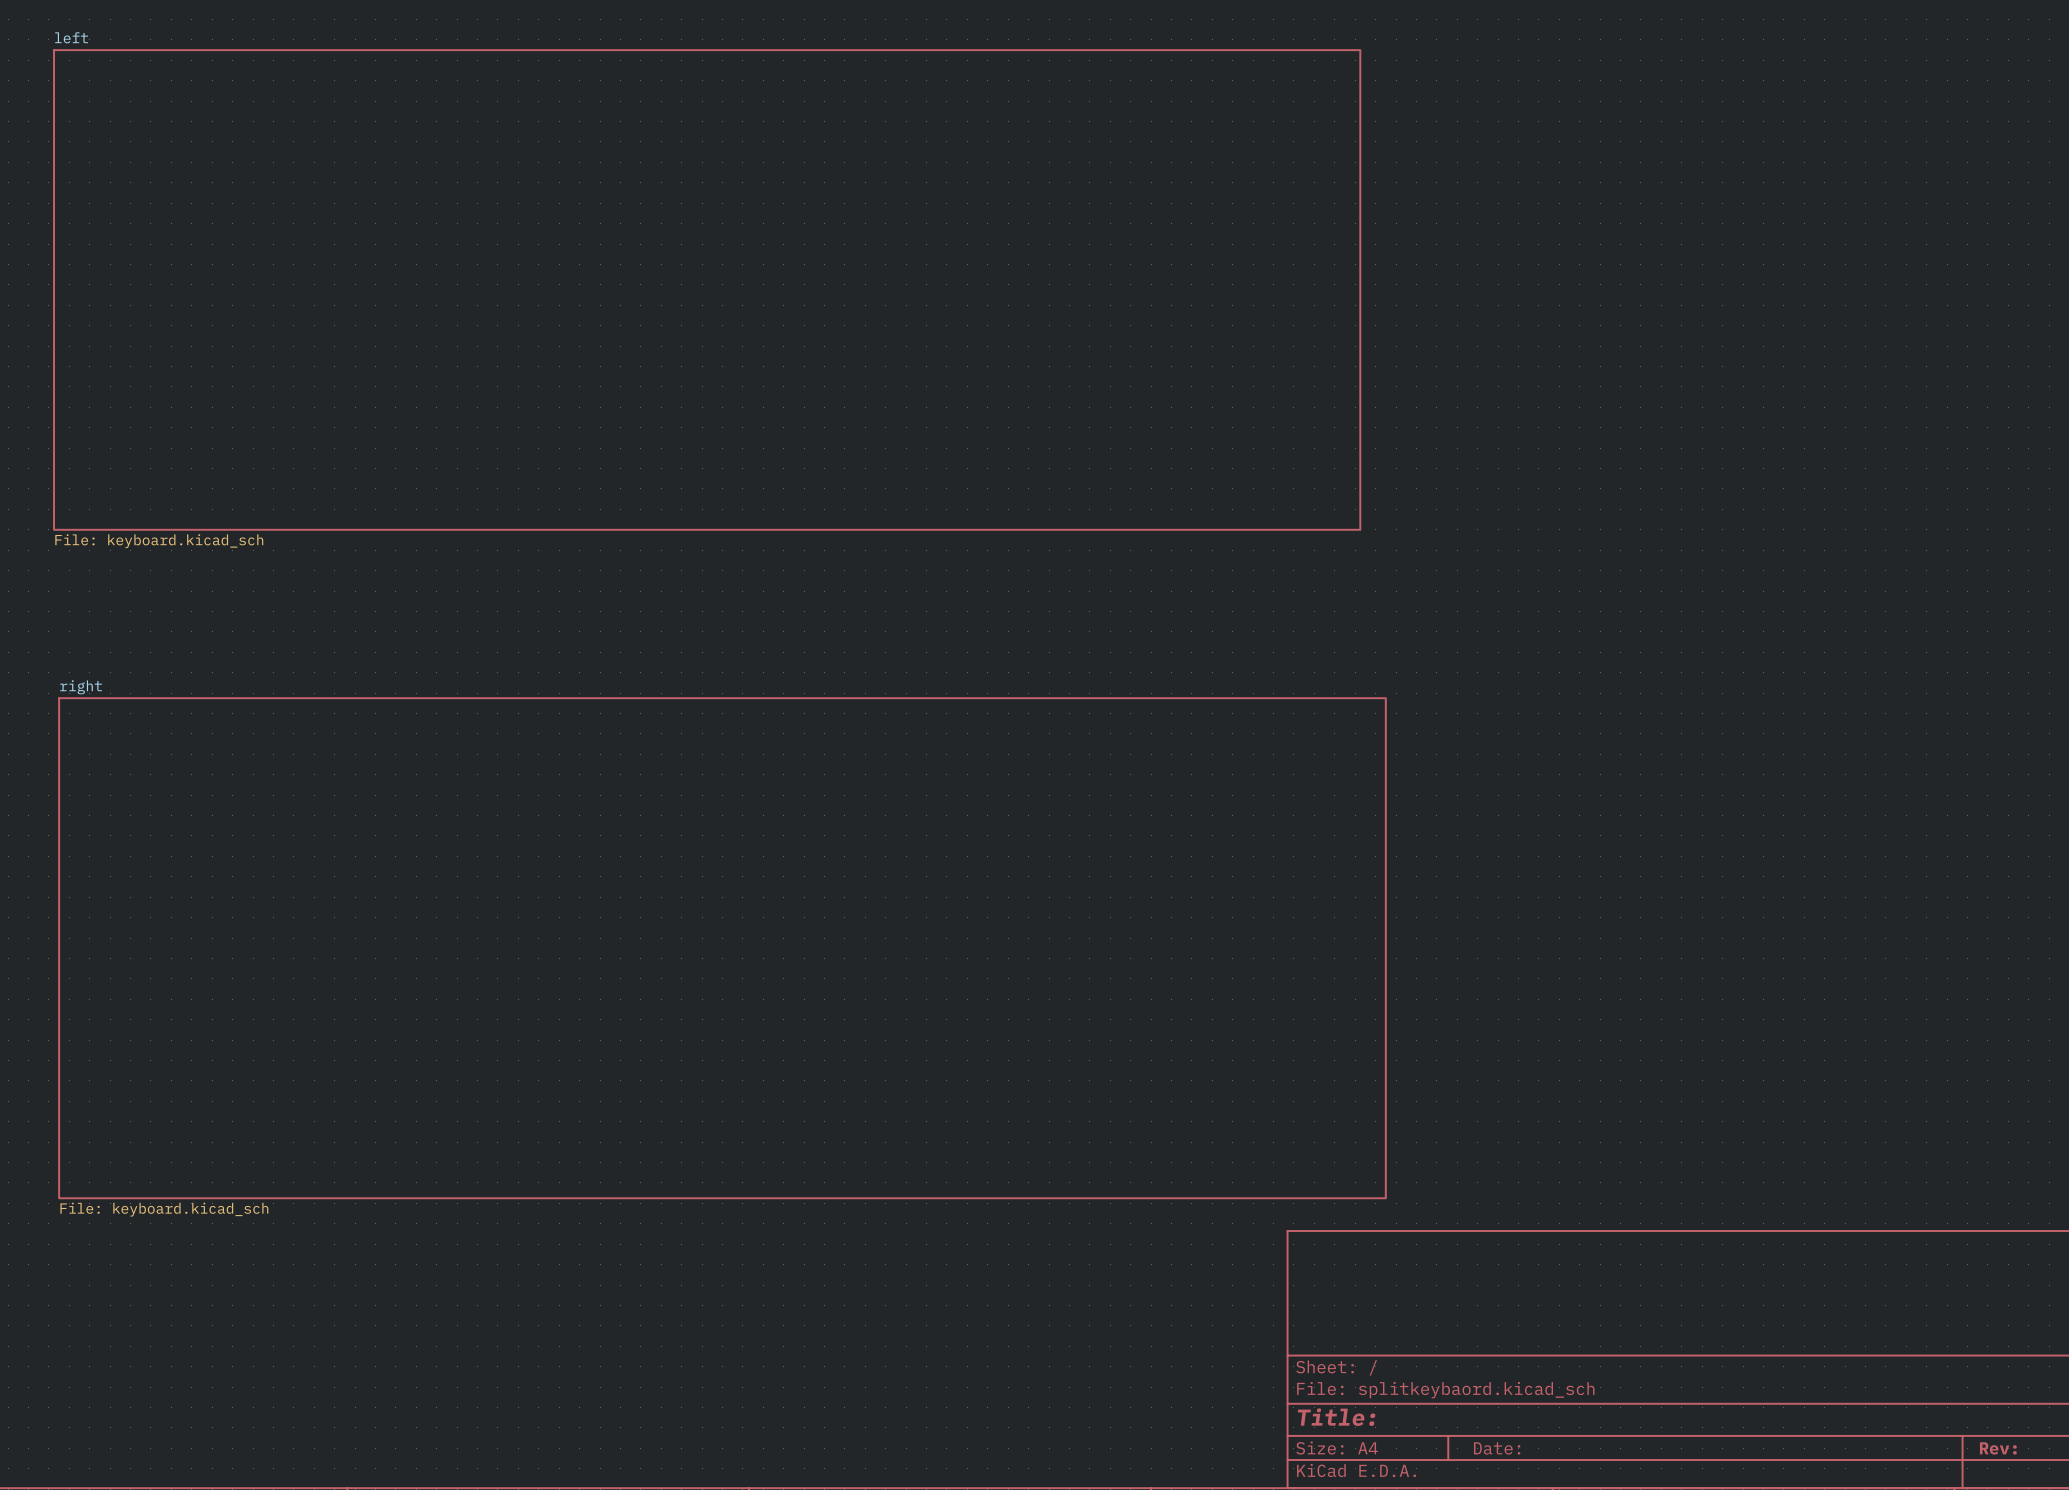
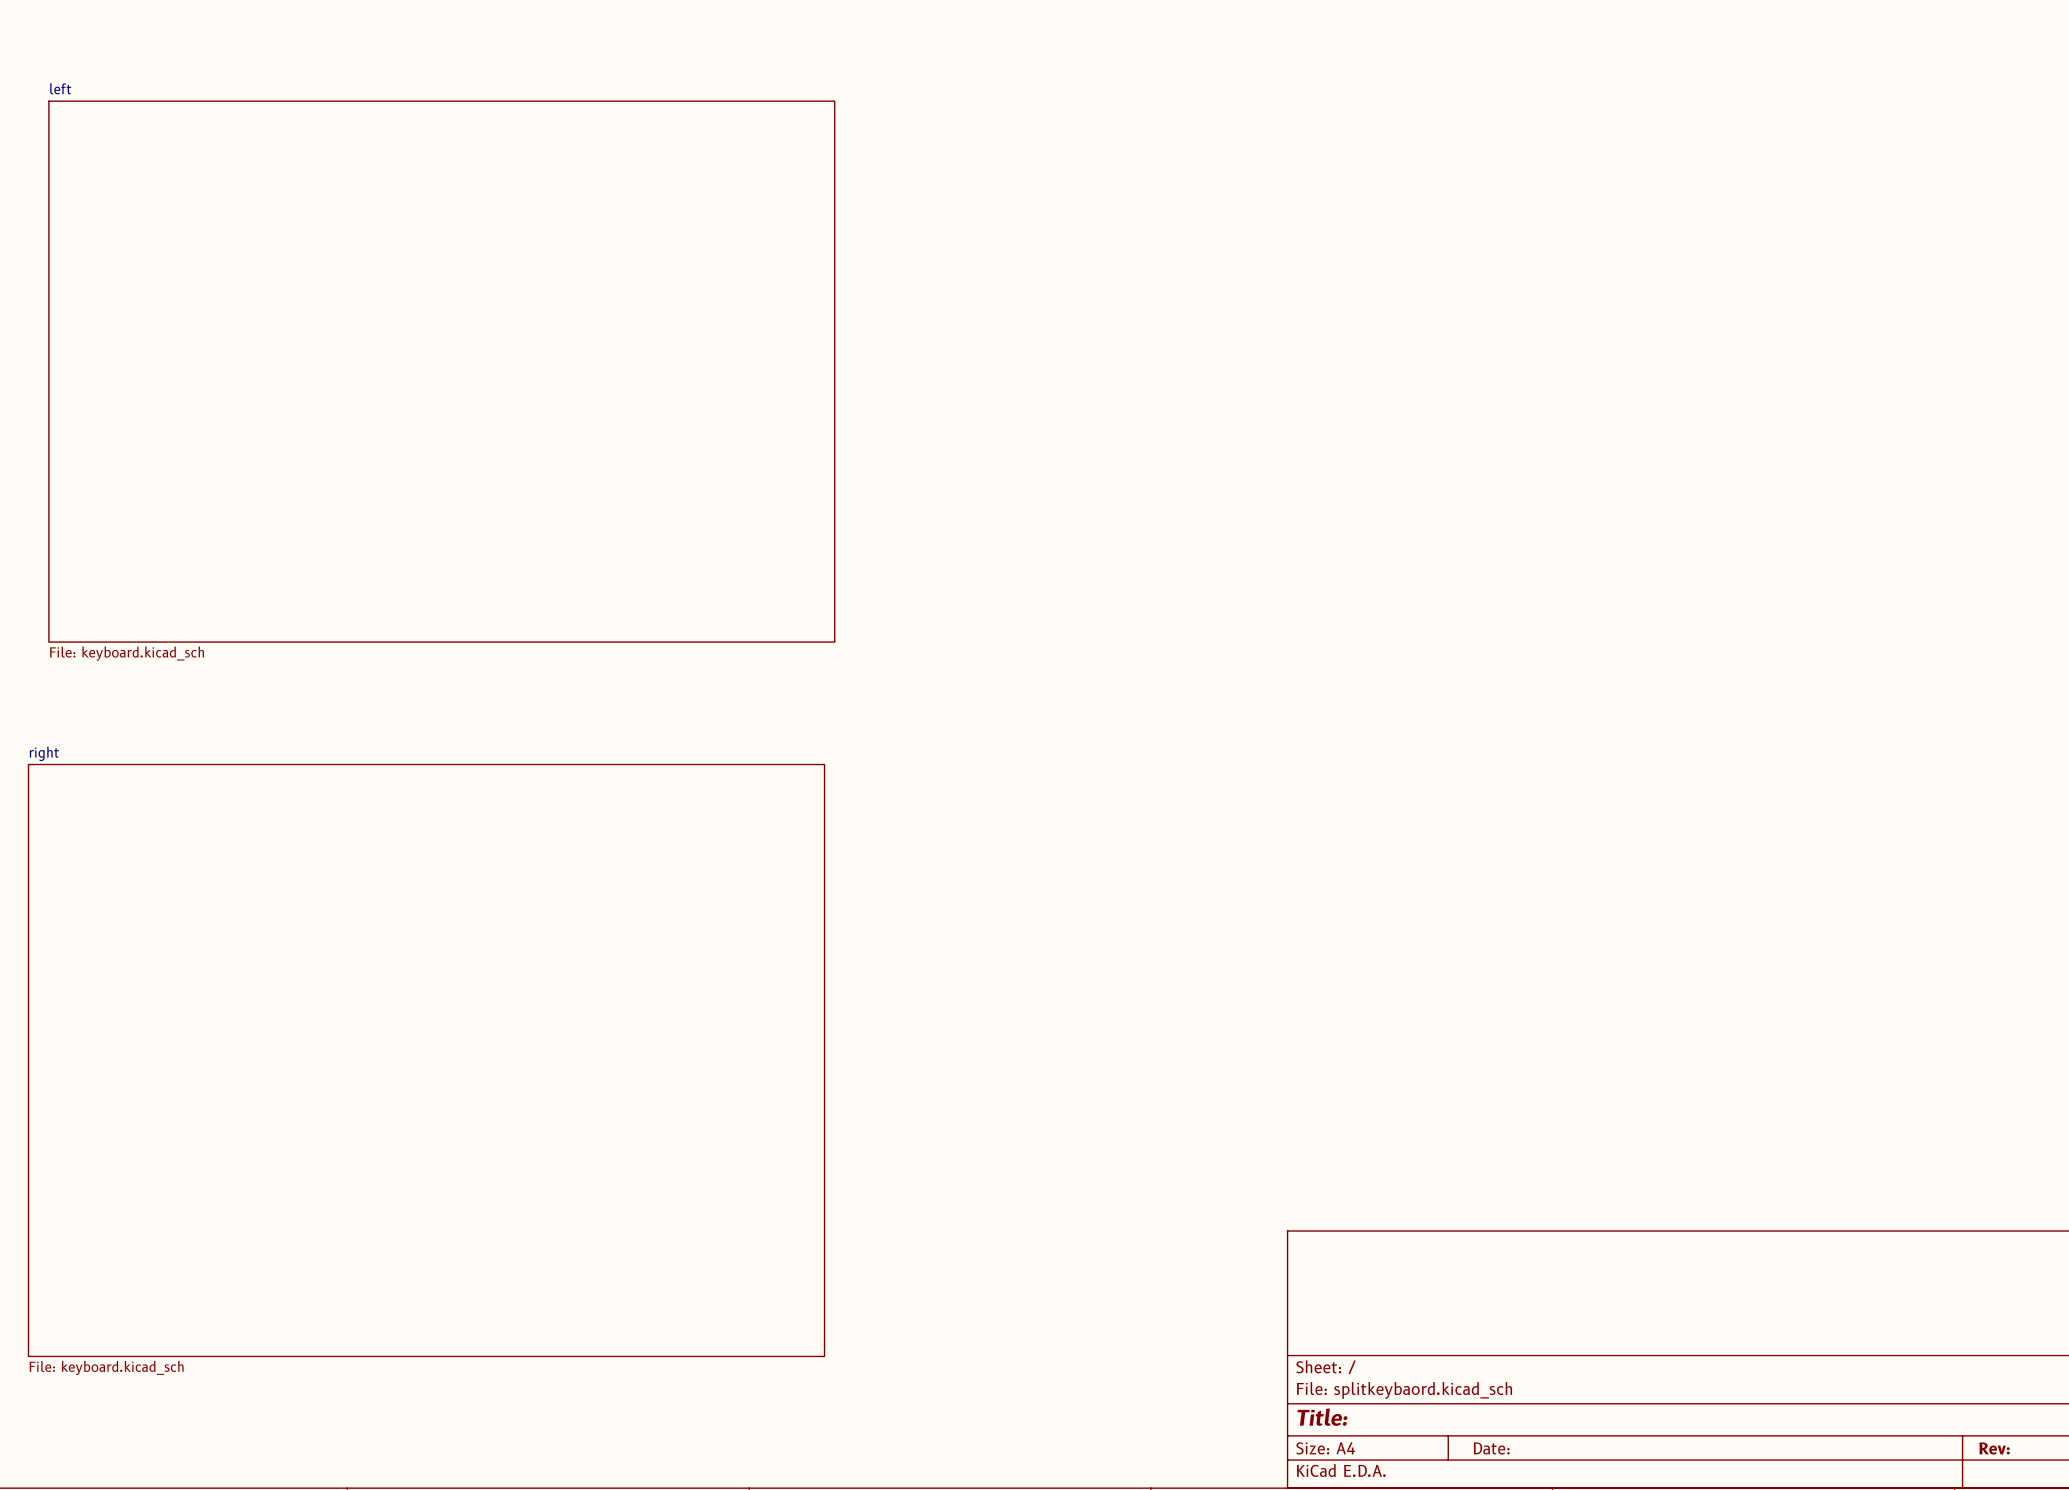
sheet left: File: keyboard.kicad_sch (707, 289) -> none
sheet left: none -> File: keyboard.kicad_sch (441, 371)
sheet right: File: keyboard.kicad_sch (722, 948) -> none
sheet right: none -> File: keyboard.kicad_sch (426, 1060)

